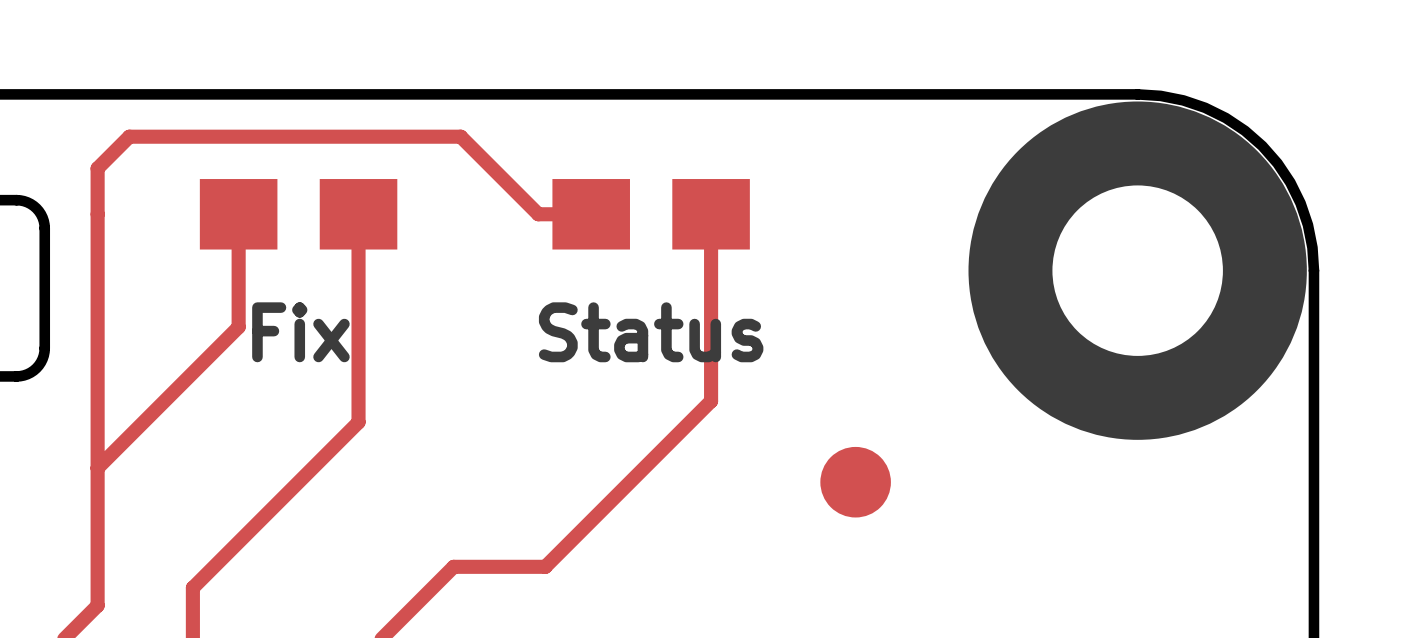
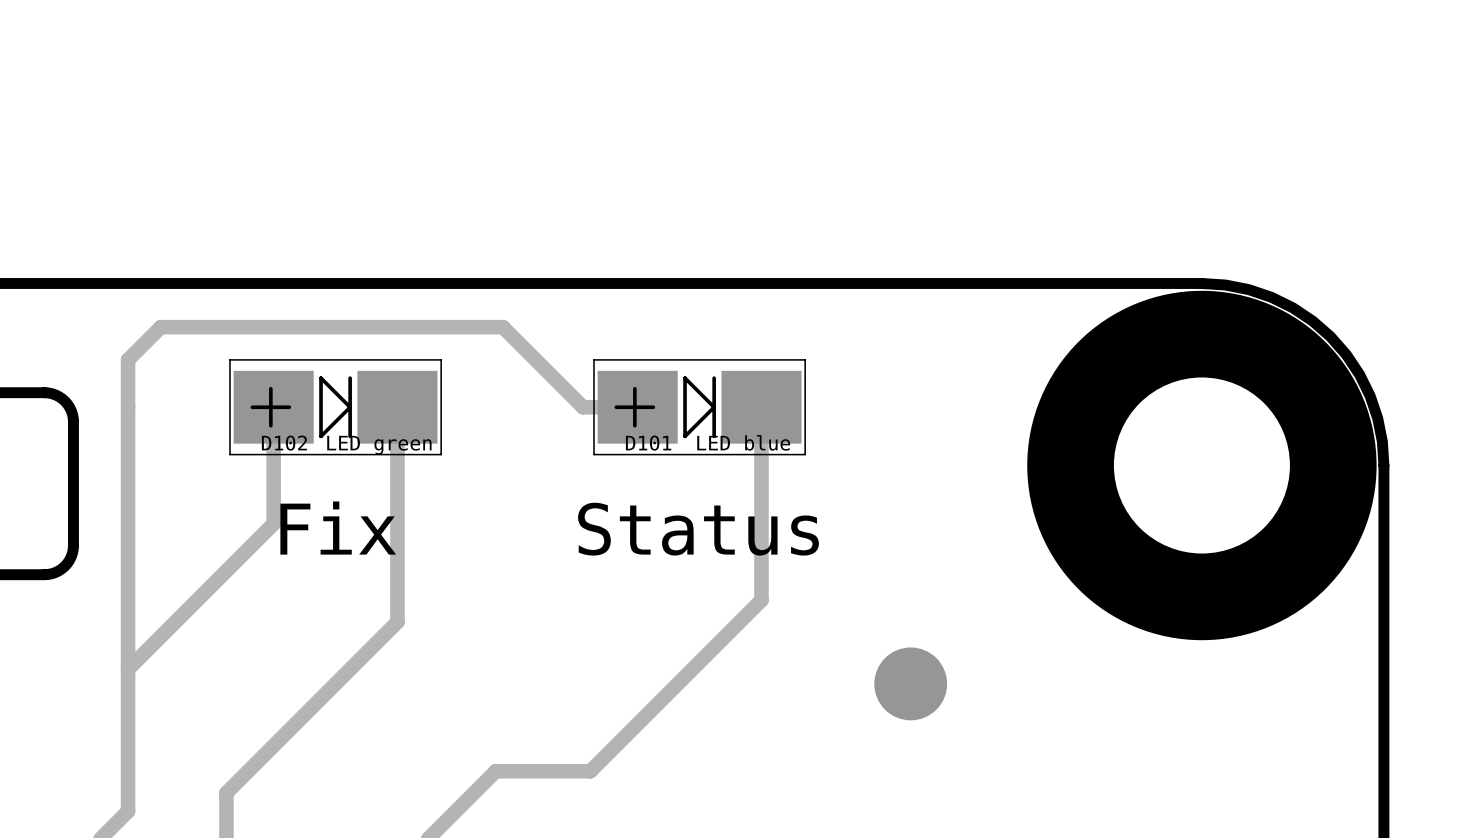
part: (298, 214) -> none
D102: none -> LED green (335, 407)
part: (651, 214) -> none
D101: none -> LED blue (699, 407)

